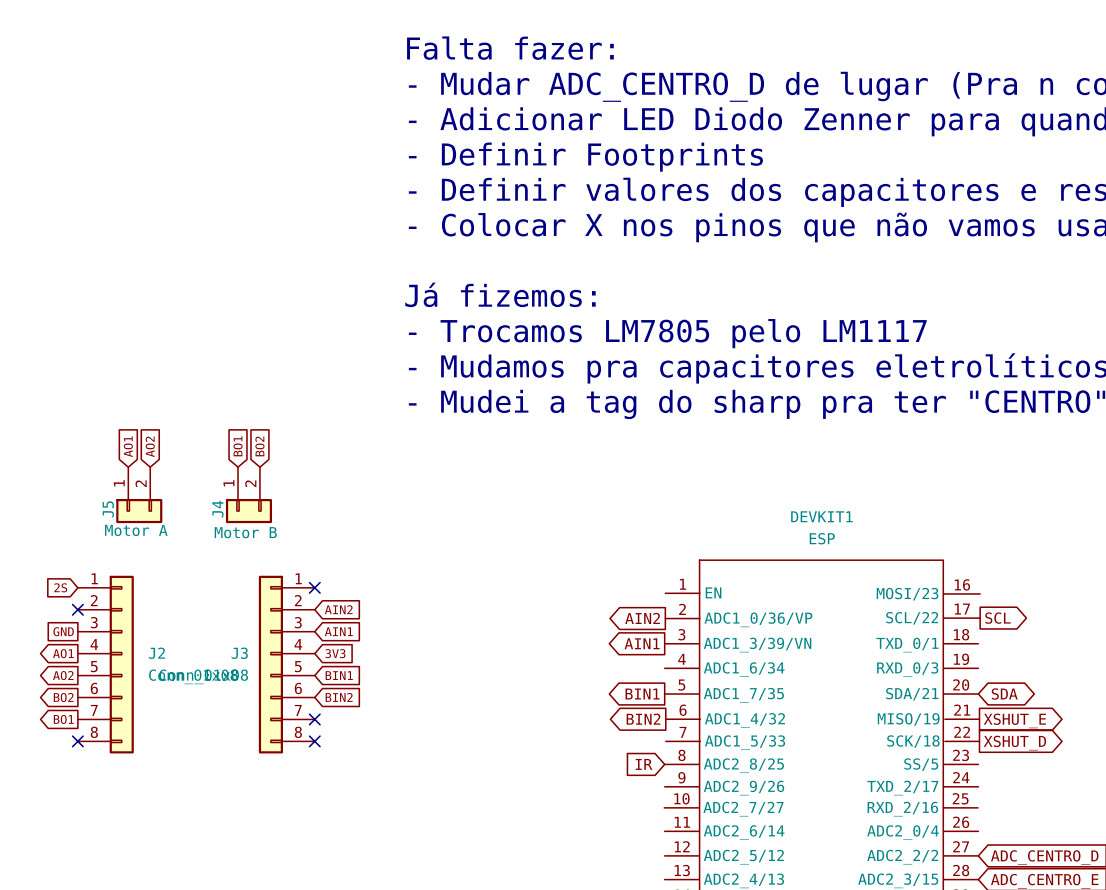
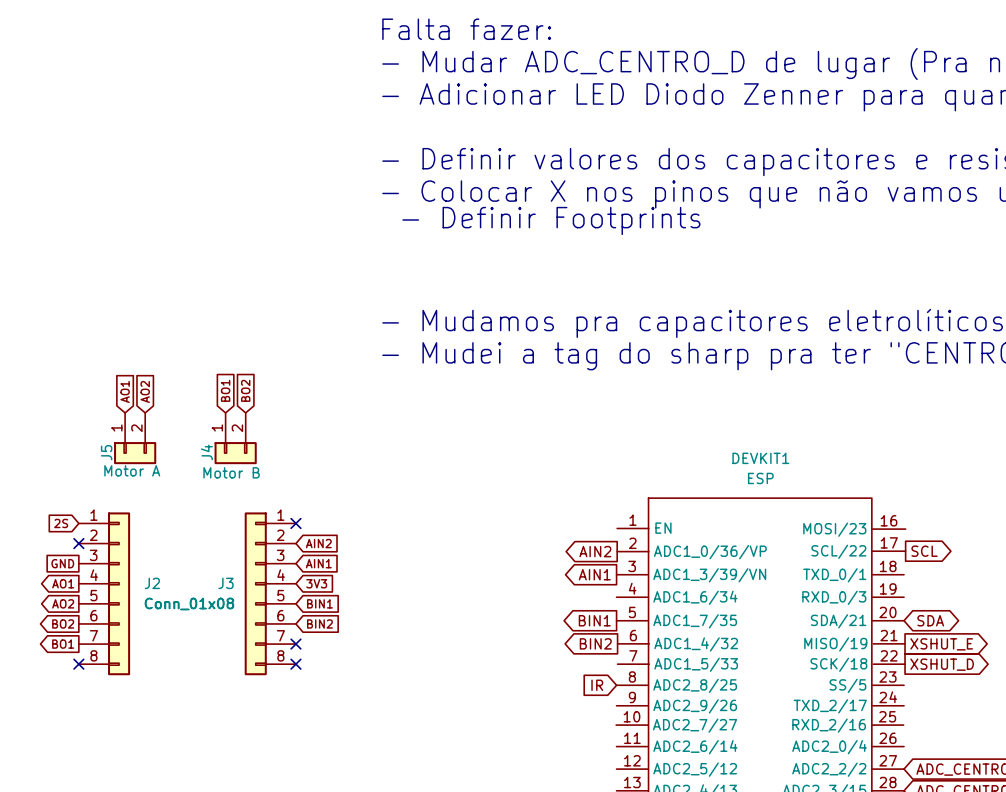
text position: - Definir Footprints (585, 157) -> - Definir Footprints (551, 220)
text: Já fizemos: (500, 294) -> none
text: - Trocamos LM7805 pelo LM1117 (667, 333) -> none

